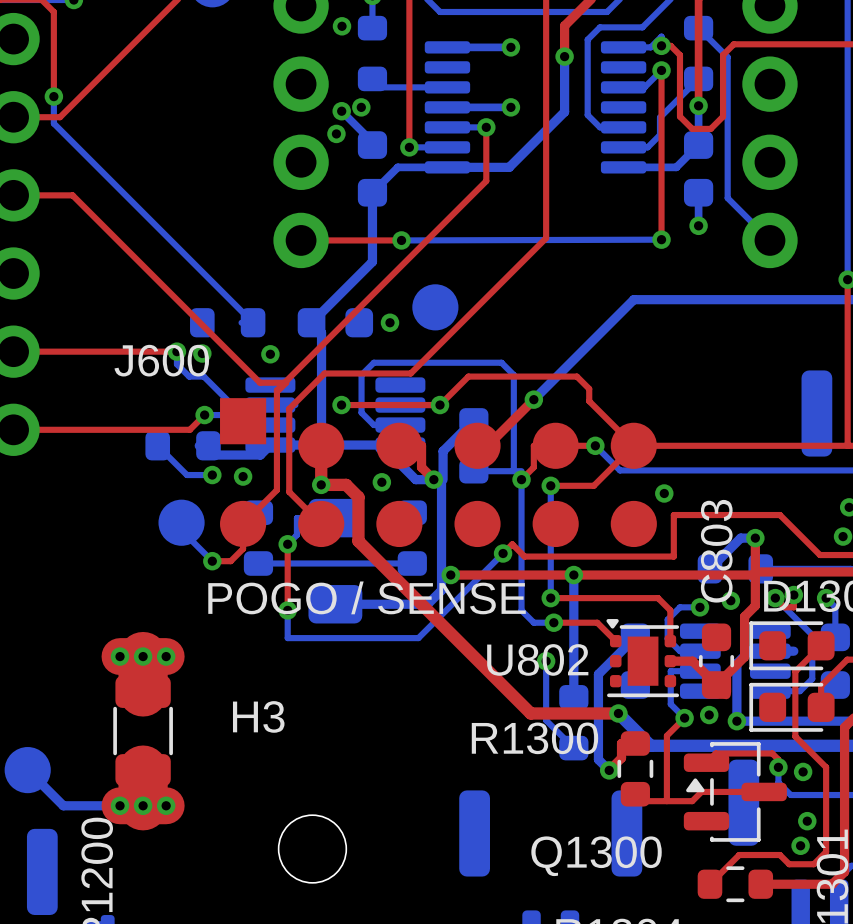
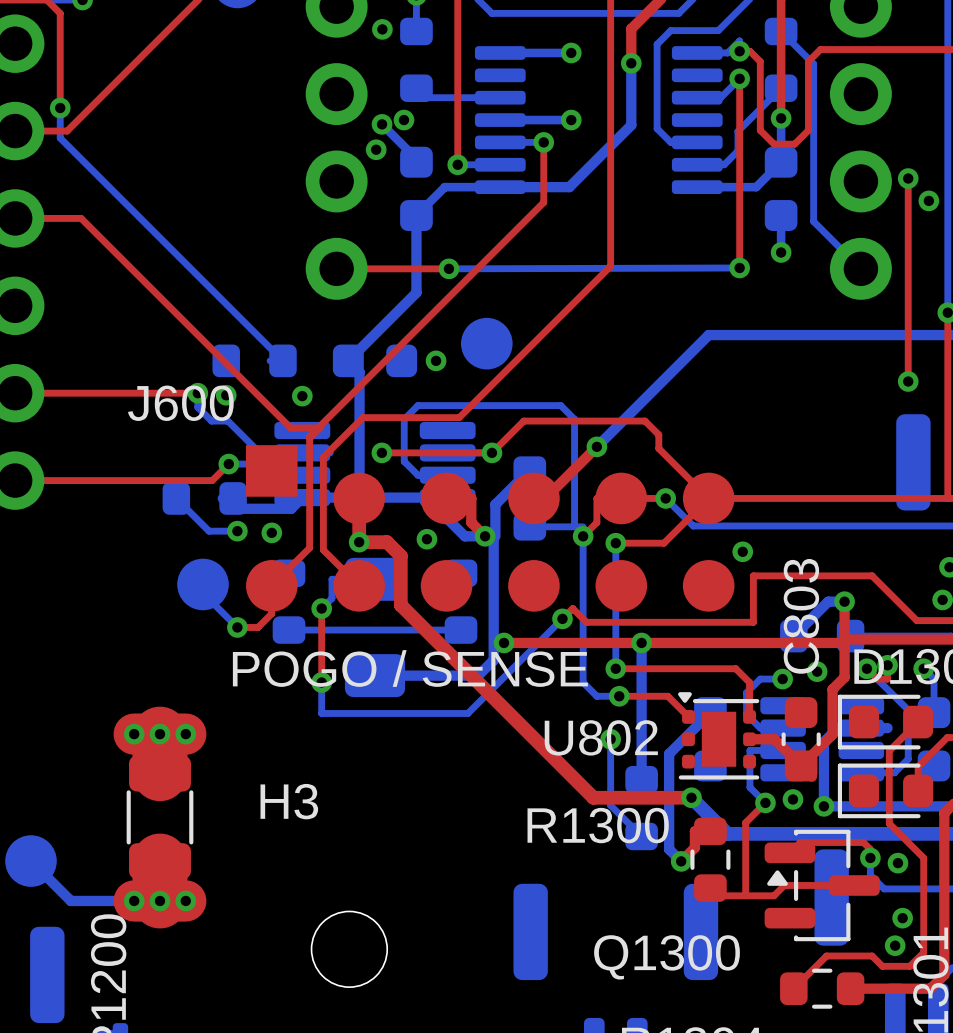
top track: none -> (908, 178) (908, 381)
via: none -> (908, 178)
via: none -> (928, 200)
via: none -> (908, 381)

